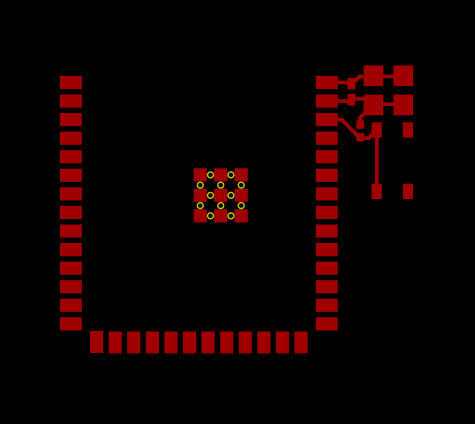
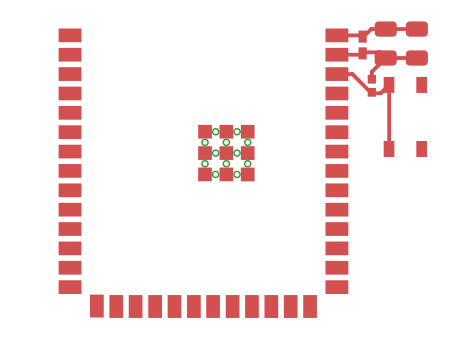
part footprint: [363, 65, 384, 116] -> [374, 21, 397, 66]
part footprint: [393, 65, 414, 116] -> [405, 21, 428, 66]

